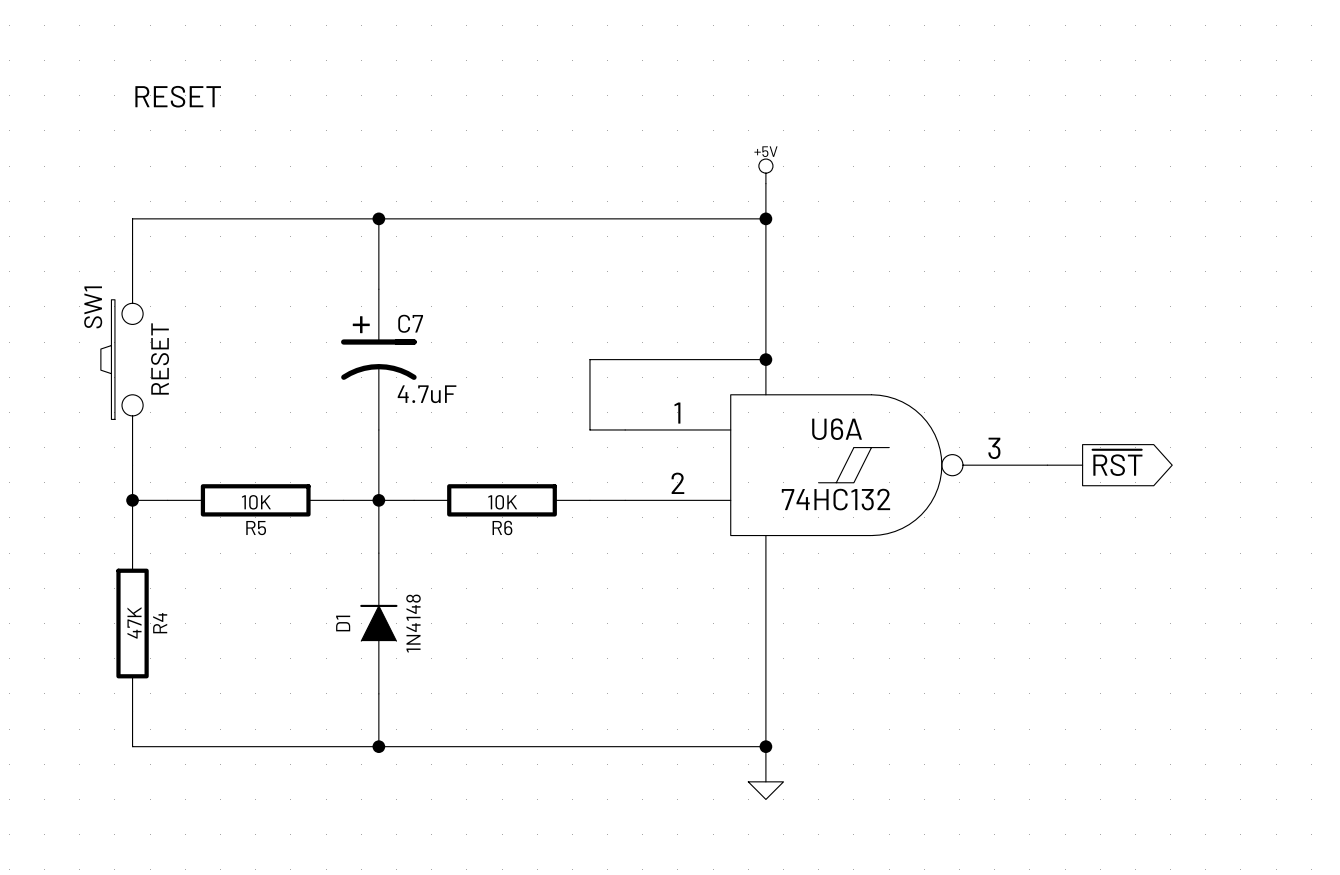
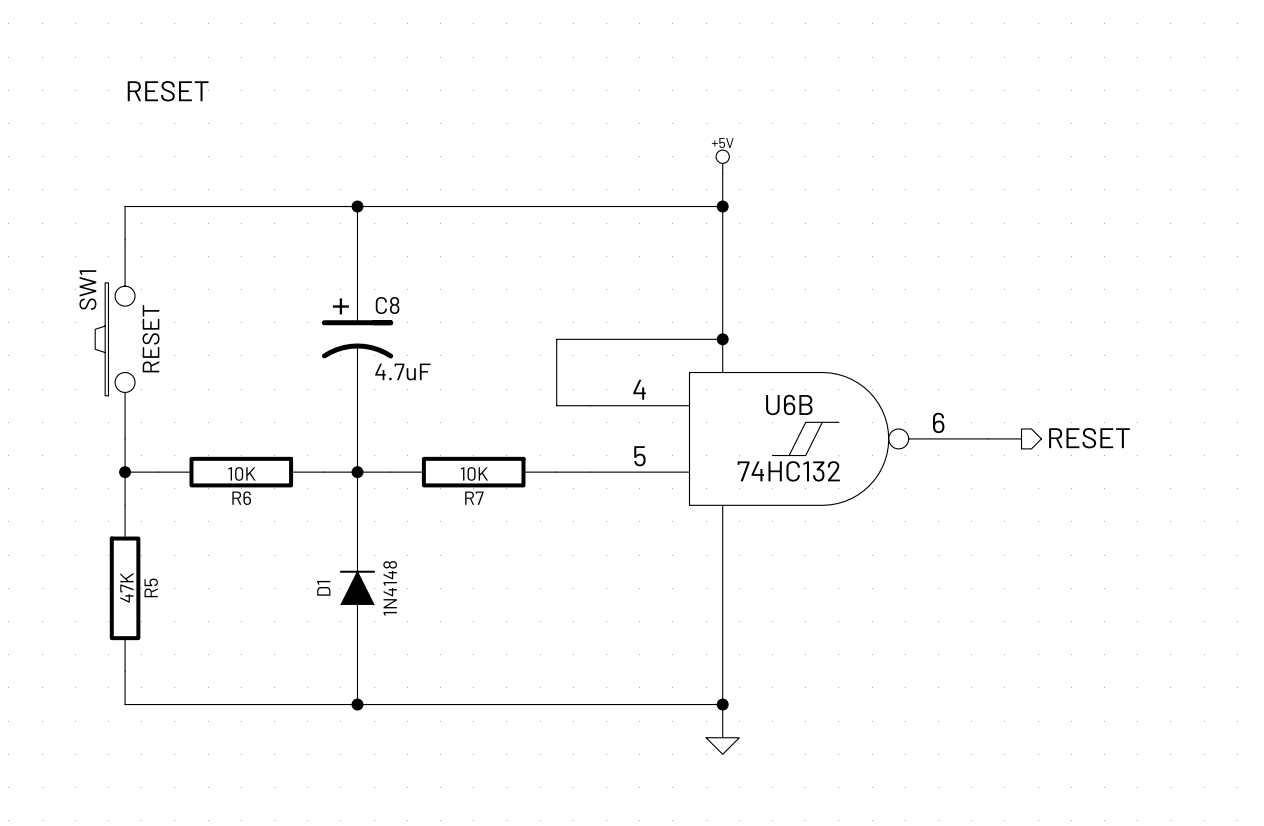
C7 name: C7 (410, 323) -> C8 (387, 305)
U6A pin number: 1 (677, 413) -> 4 (639, 389)
U6A name: U6A (837, 429) -> U6B (789, 404)
U6A pin number: 3 (994, 448) -> 6 (938, 422)
global label: ~{RST} (1117, 462) -> none
hierarchical label: none -> RESET (1089, 438)
U6A pin number: 2 (677, 483) -> 5 (639, 456)
R6 name: R6 (502, 527) -> R7 (474, 498)
R5 name: R5 (256, 528) -> R6 (241, 498)
R4 name: R4 (160, 623) -> R5 (151, 587)

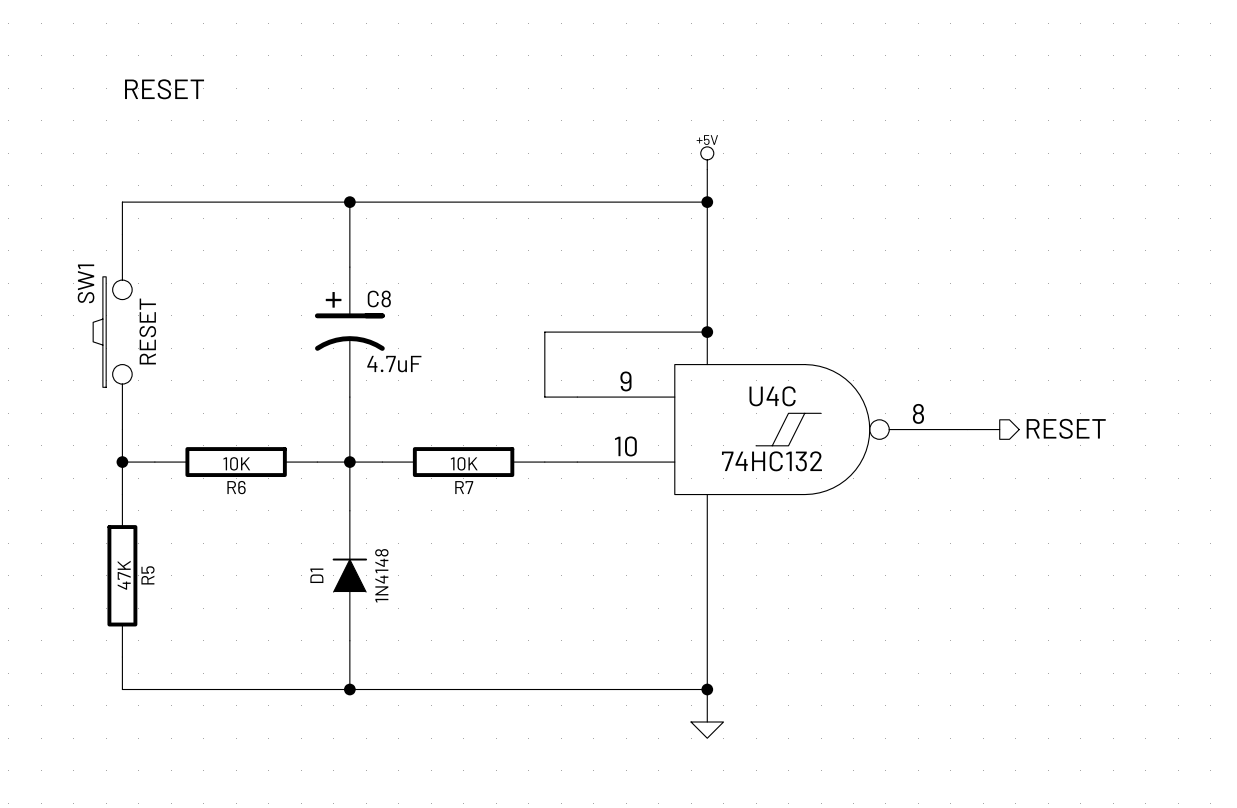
U6B pin number: 4 (639, 389) -> 9 (625, 381)
U6B name: U6B (789, 404) -> U4C (772, 396)
U6B pin number: 6 (938, 422) -> 8 (918, 413)
U6B pin number: 5 (639, 456) -> 10 (625, 446)

